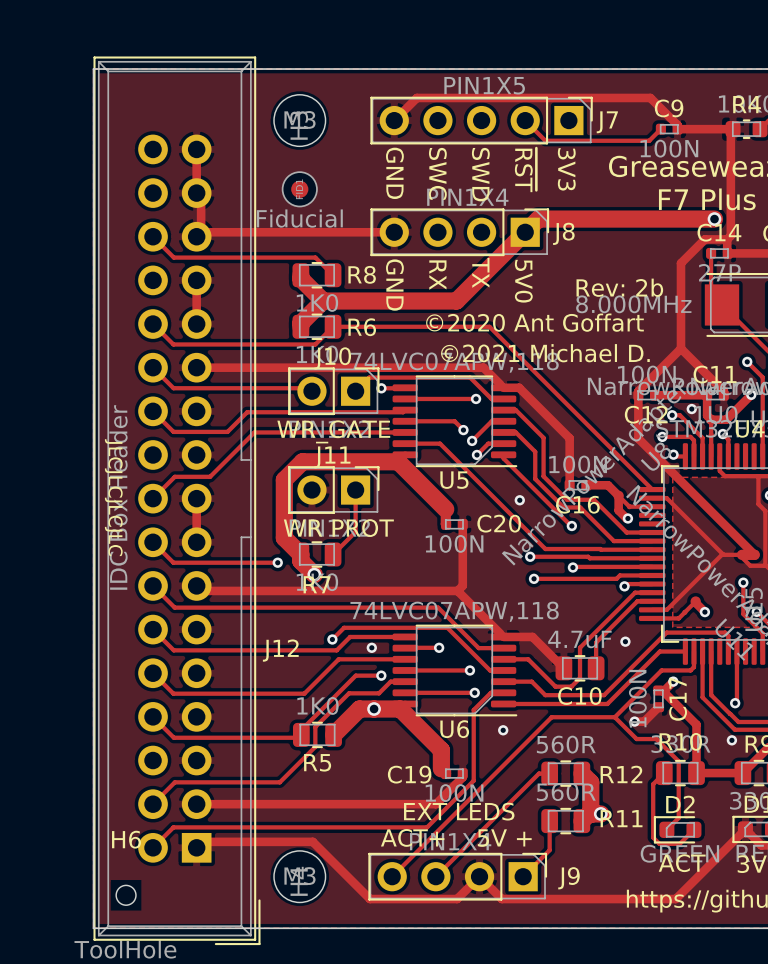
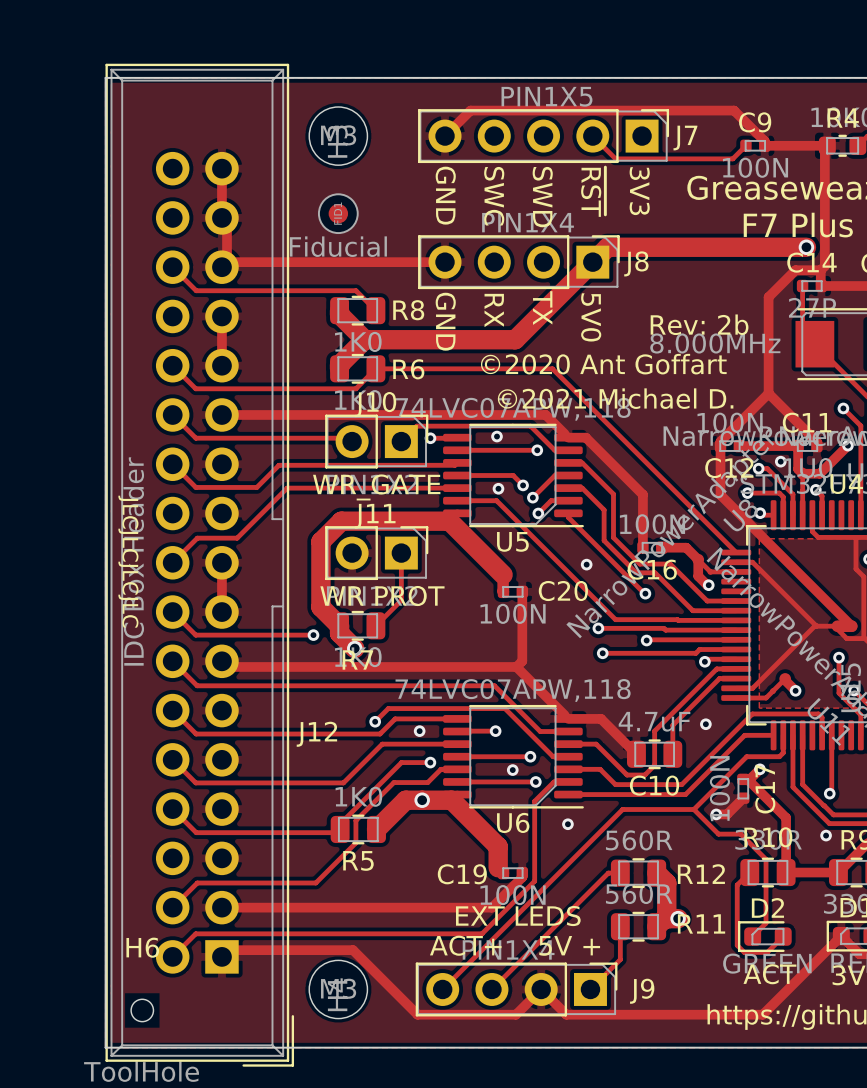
via: none -> (496, 436)
via: none -> (498, 488)
via: none -> (512, 770)

